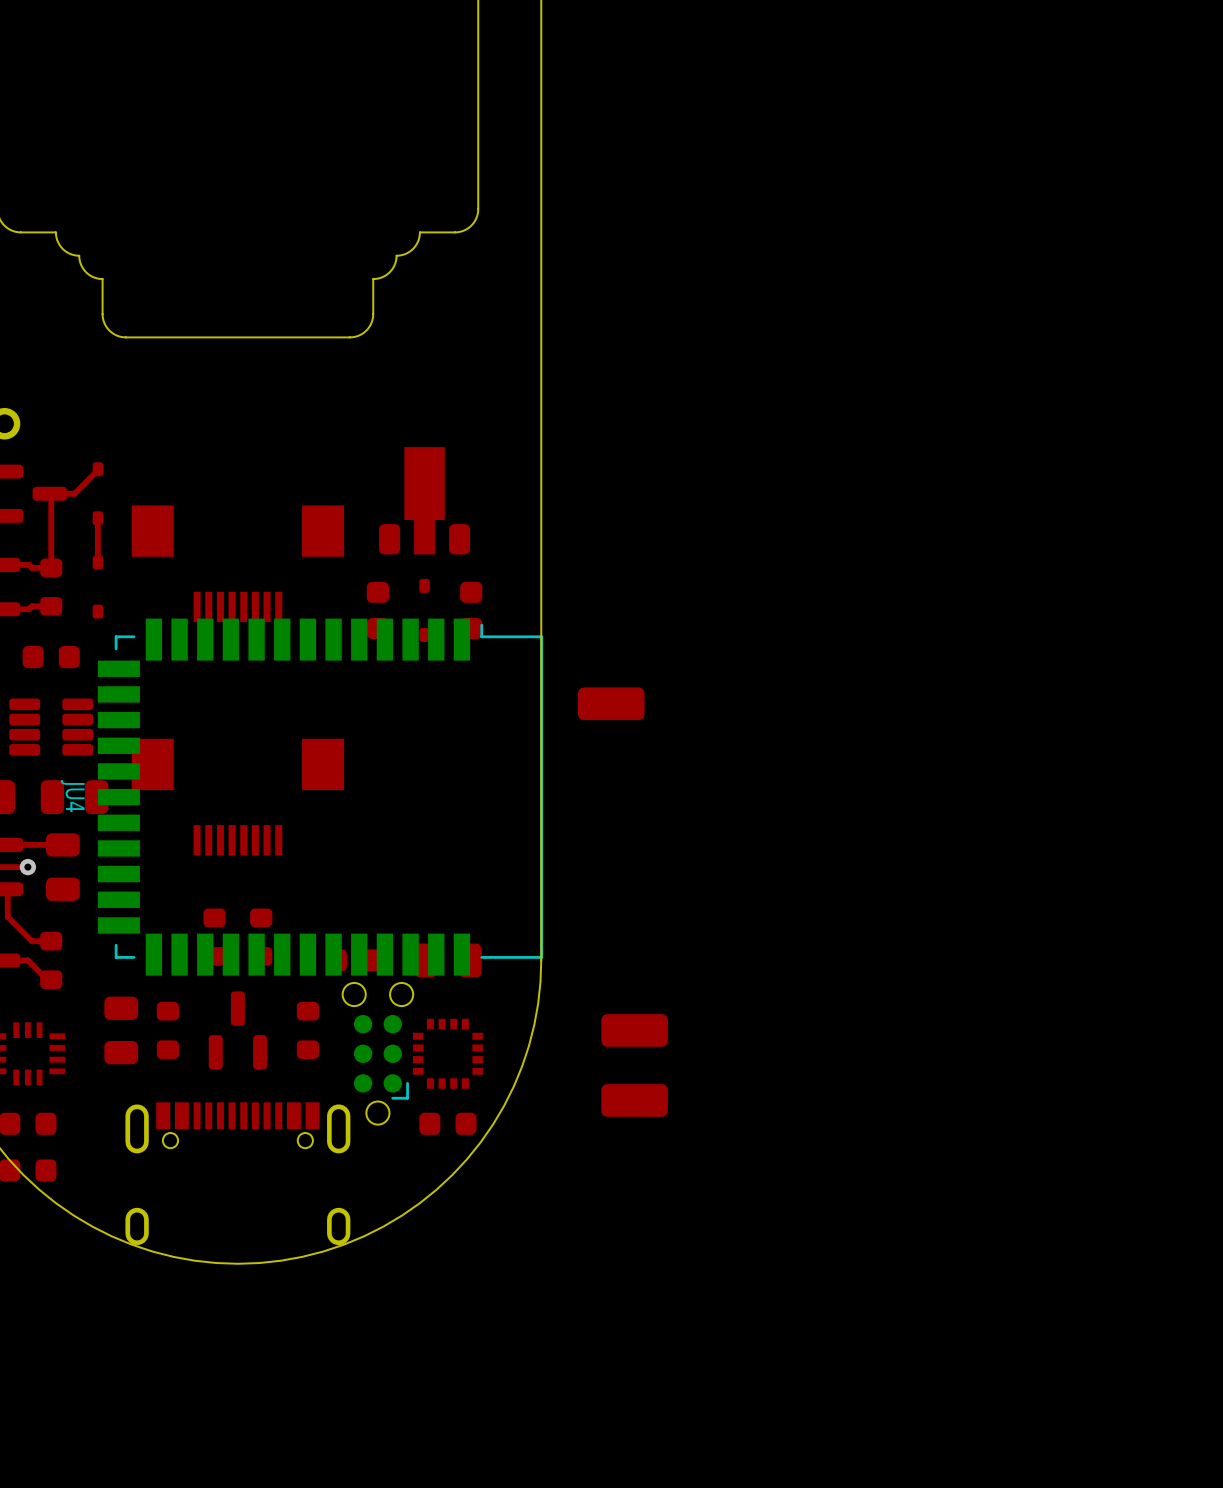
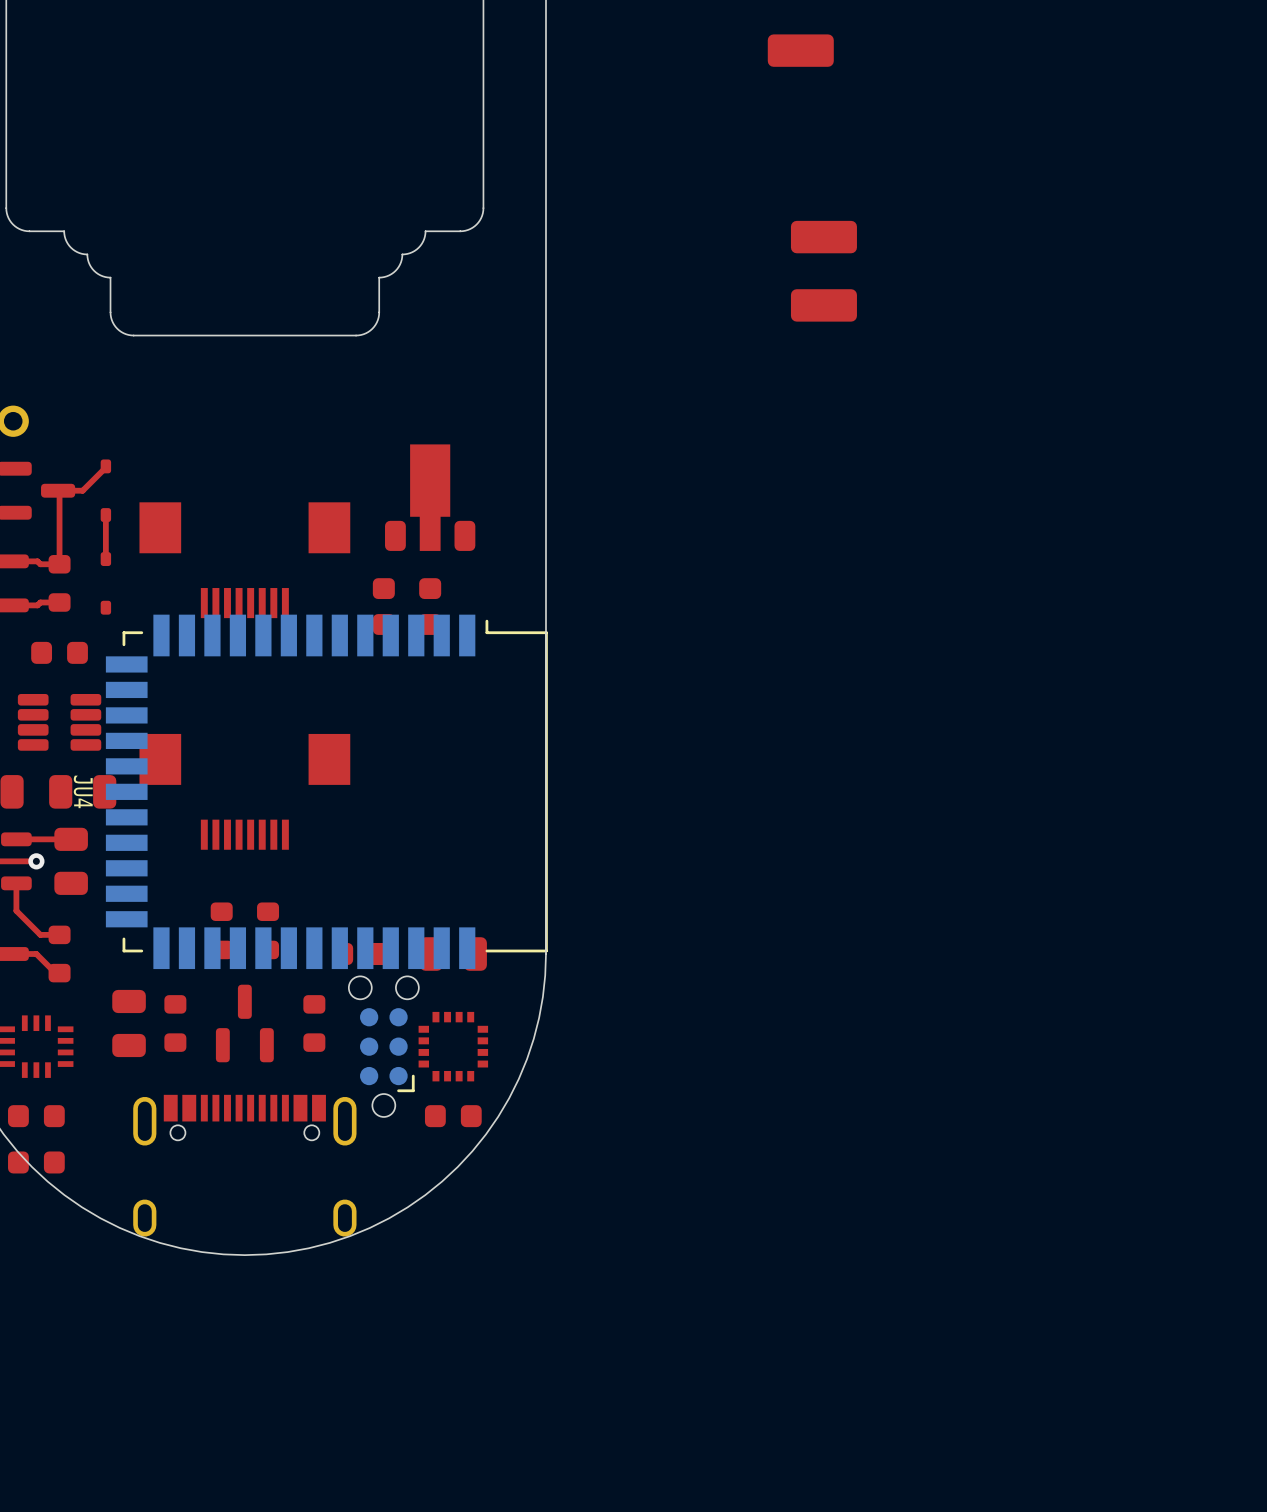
part: none -> (800, 50)
part: none -> (823, 237)
part: none -> (823, 305)
part footprint: [419, 578, 430, 642] -> [419, 578, 442, 635]
part: (471, 610) -> none
part: (611, 703) -> none
part: (634, 1030) -> none
part: (634, 1100) -> none

